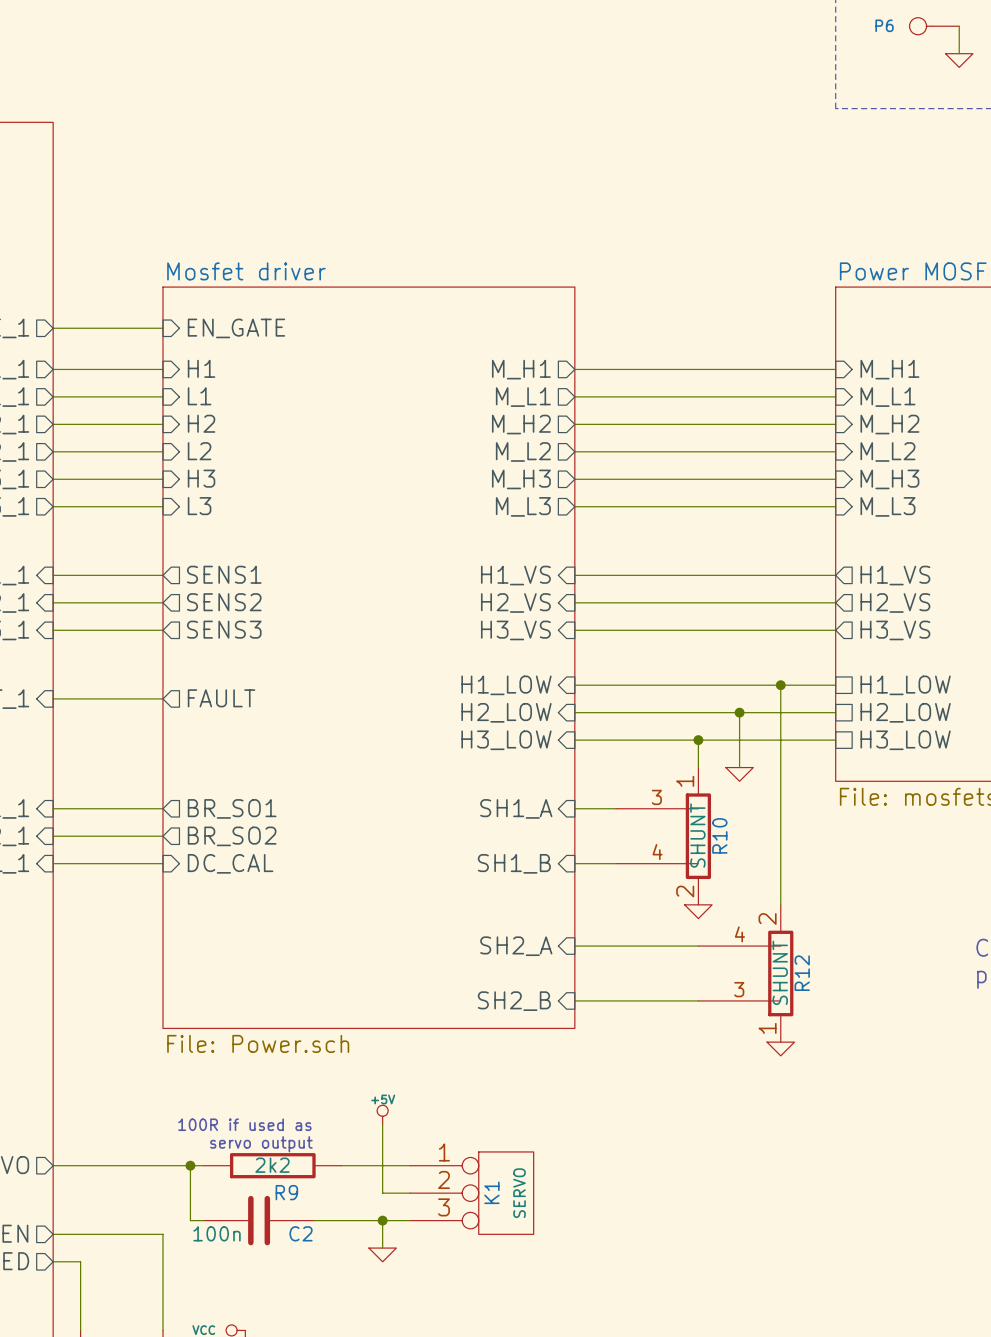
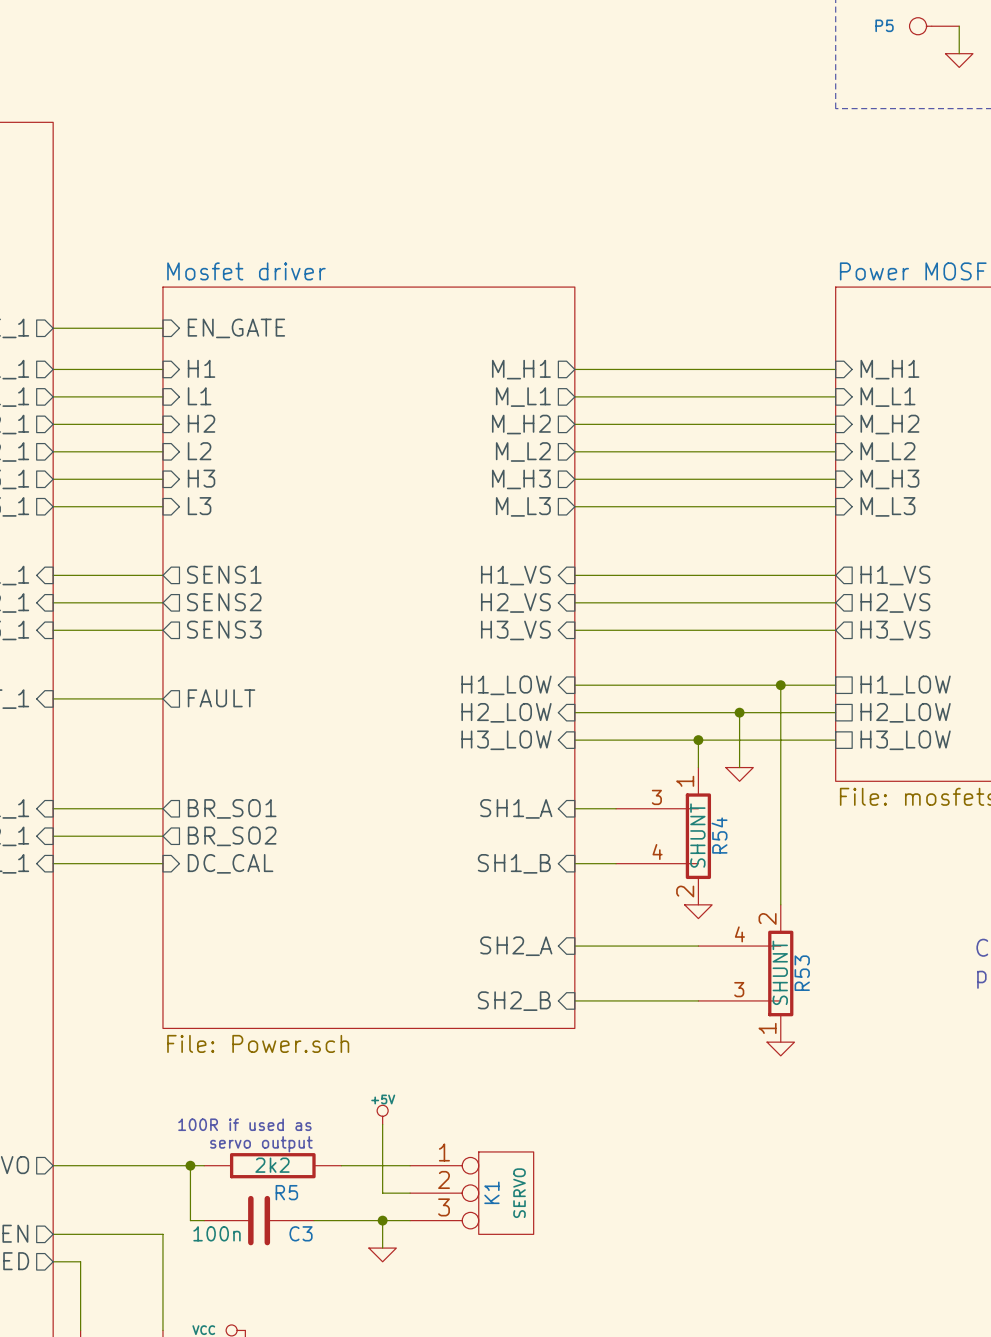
P6 name: P6 (884, 25) -> P5 (884, 25)
R10 name: R10 (719, 835) -> R54 (719, 835)
R12 name: R12 (802, 973) -> R53 (802, 973)
R9 name: R9 (286, 1192) -> R5 (286, 1192)
C2 name: C2 (301, 1233) -> C3 (301, 1233)

